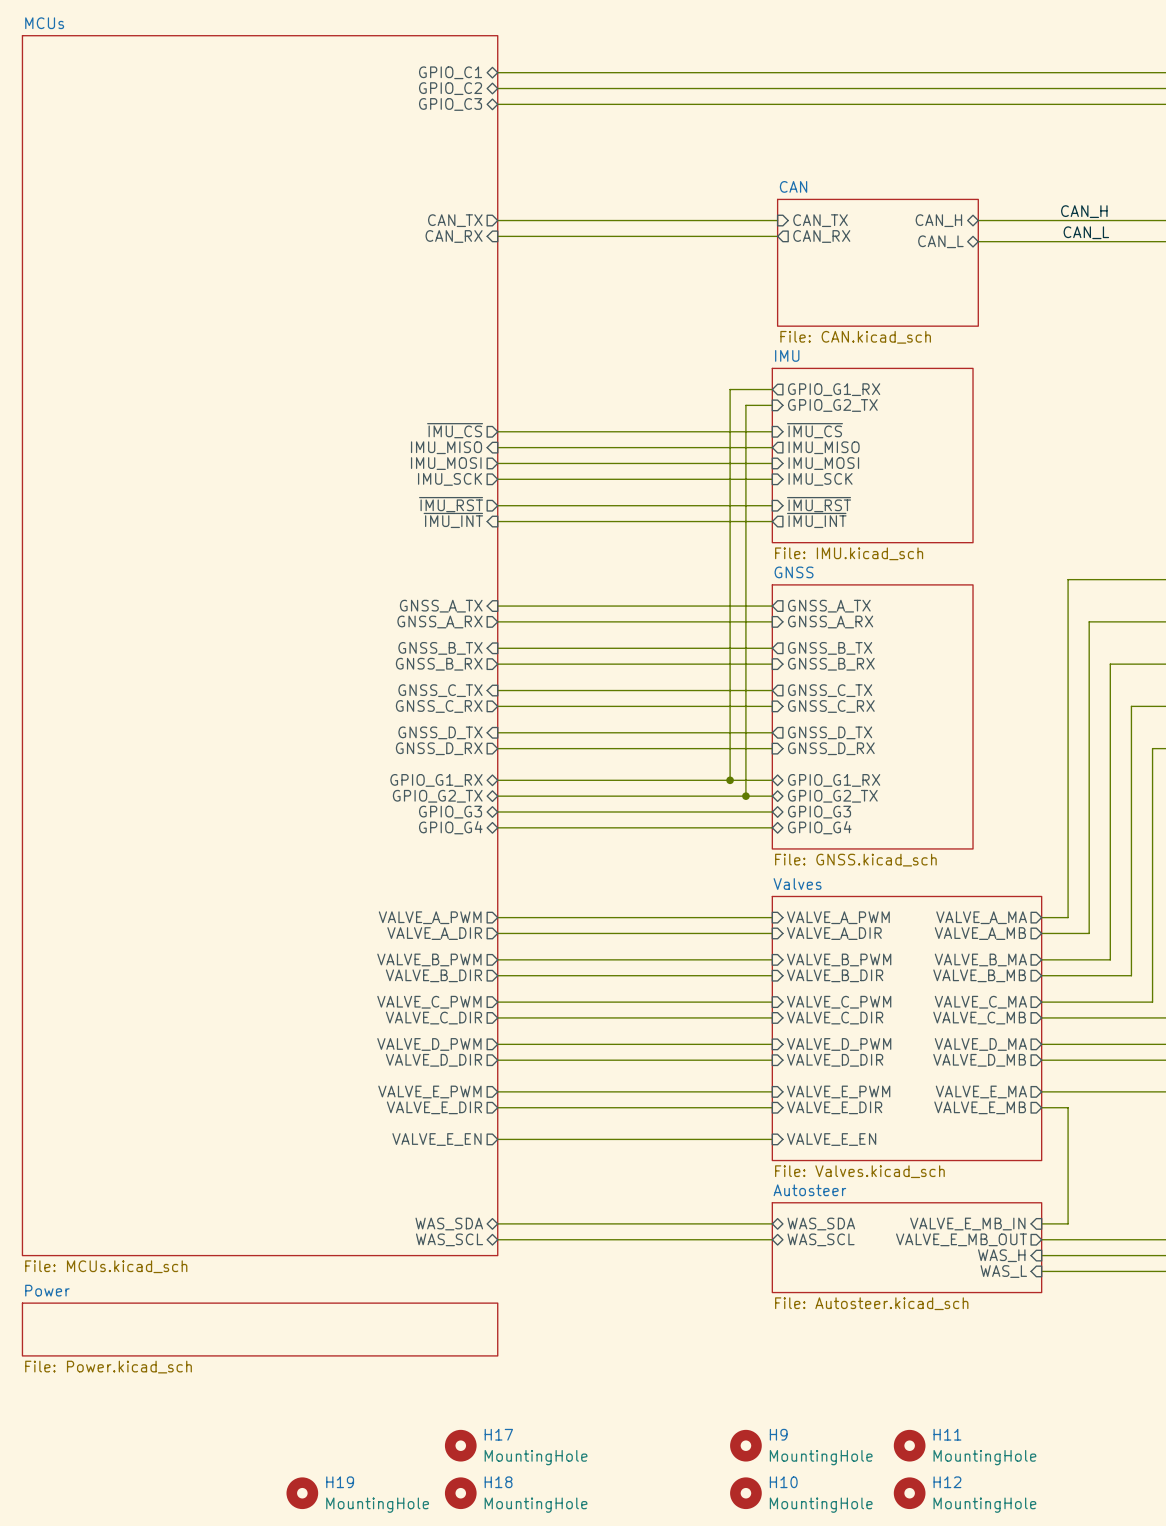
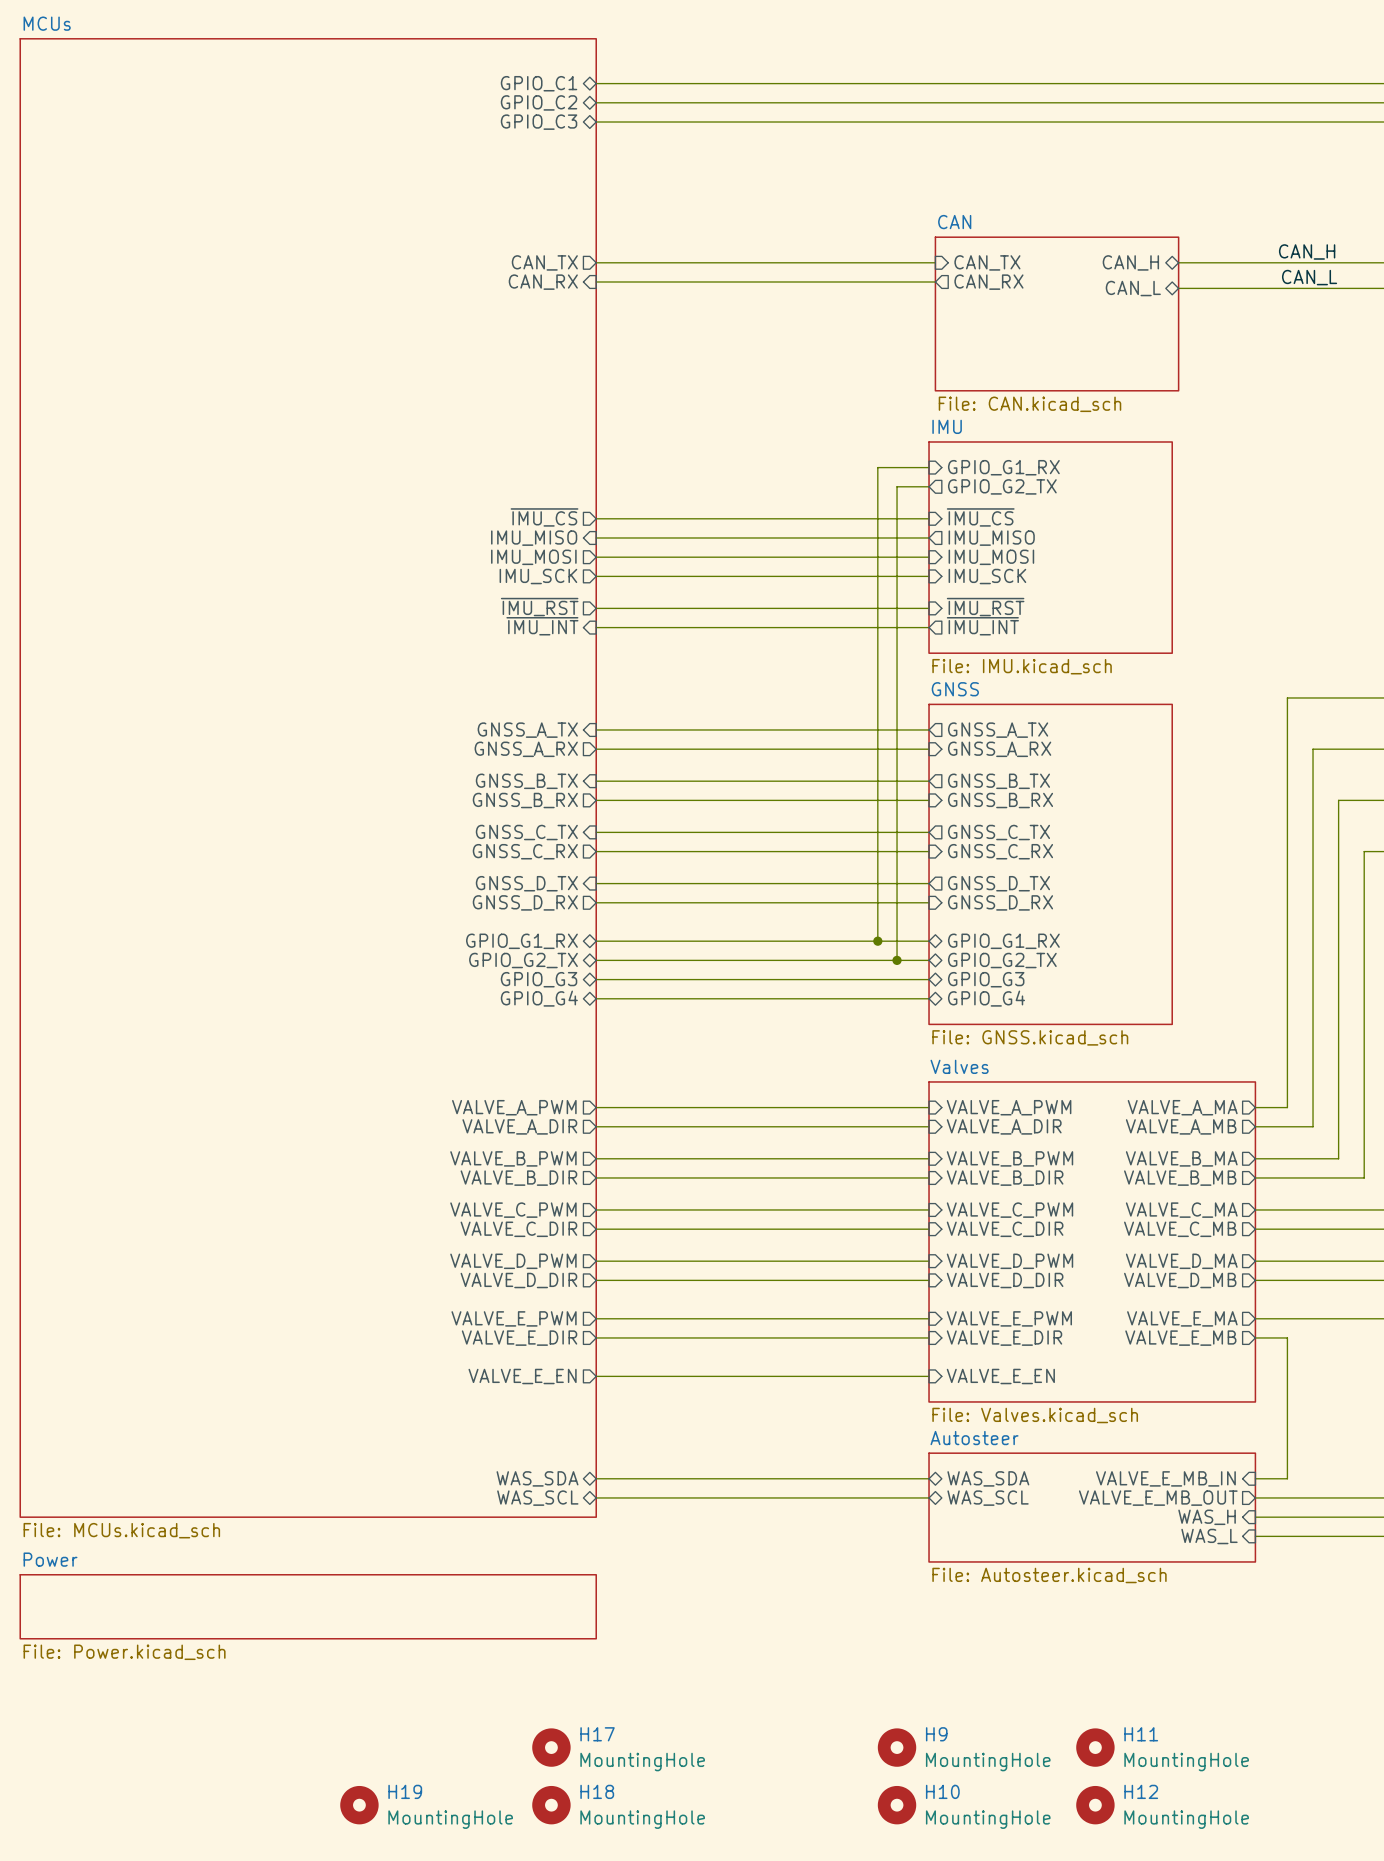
sheet pin shape: output (834, 389) -> input (1003, 467)
sheet pin shape: input (832, 405) -> output (1002, 486)

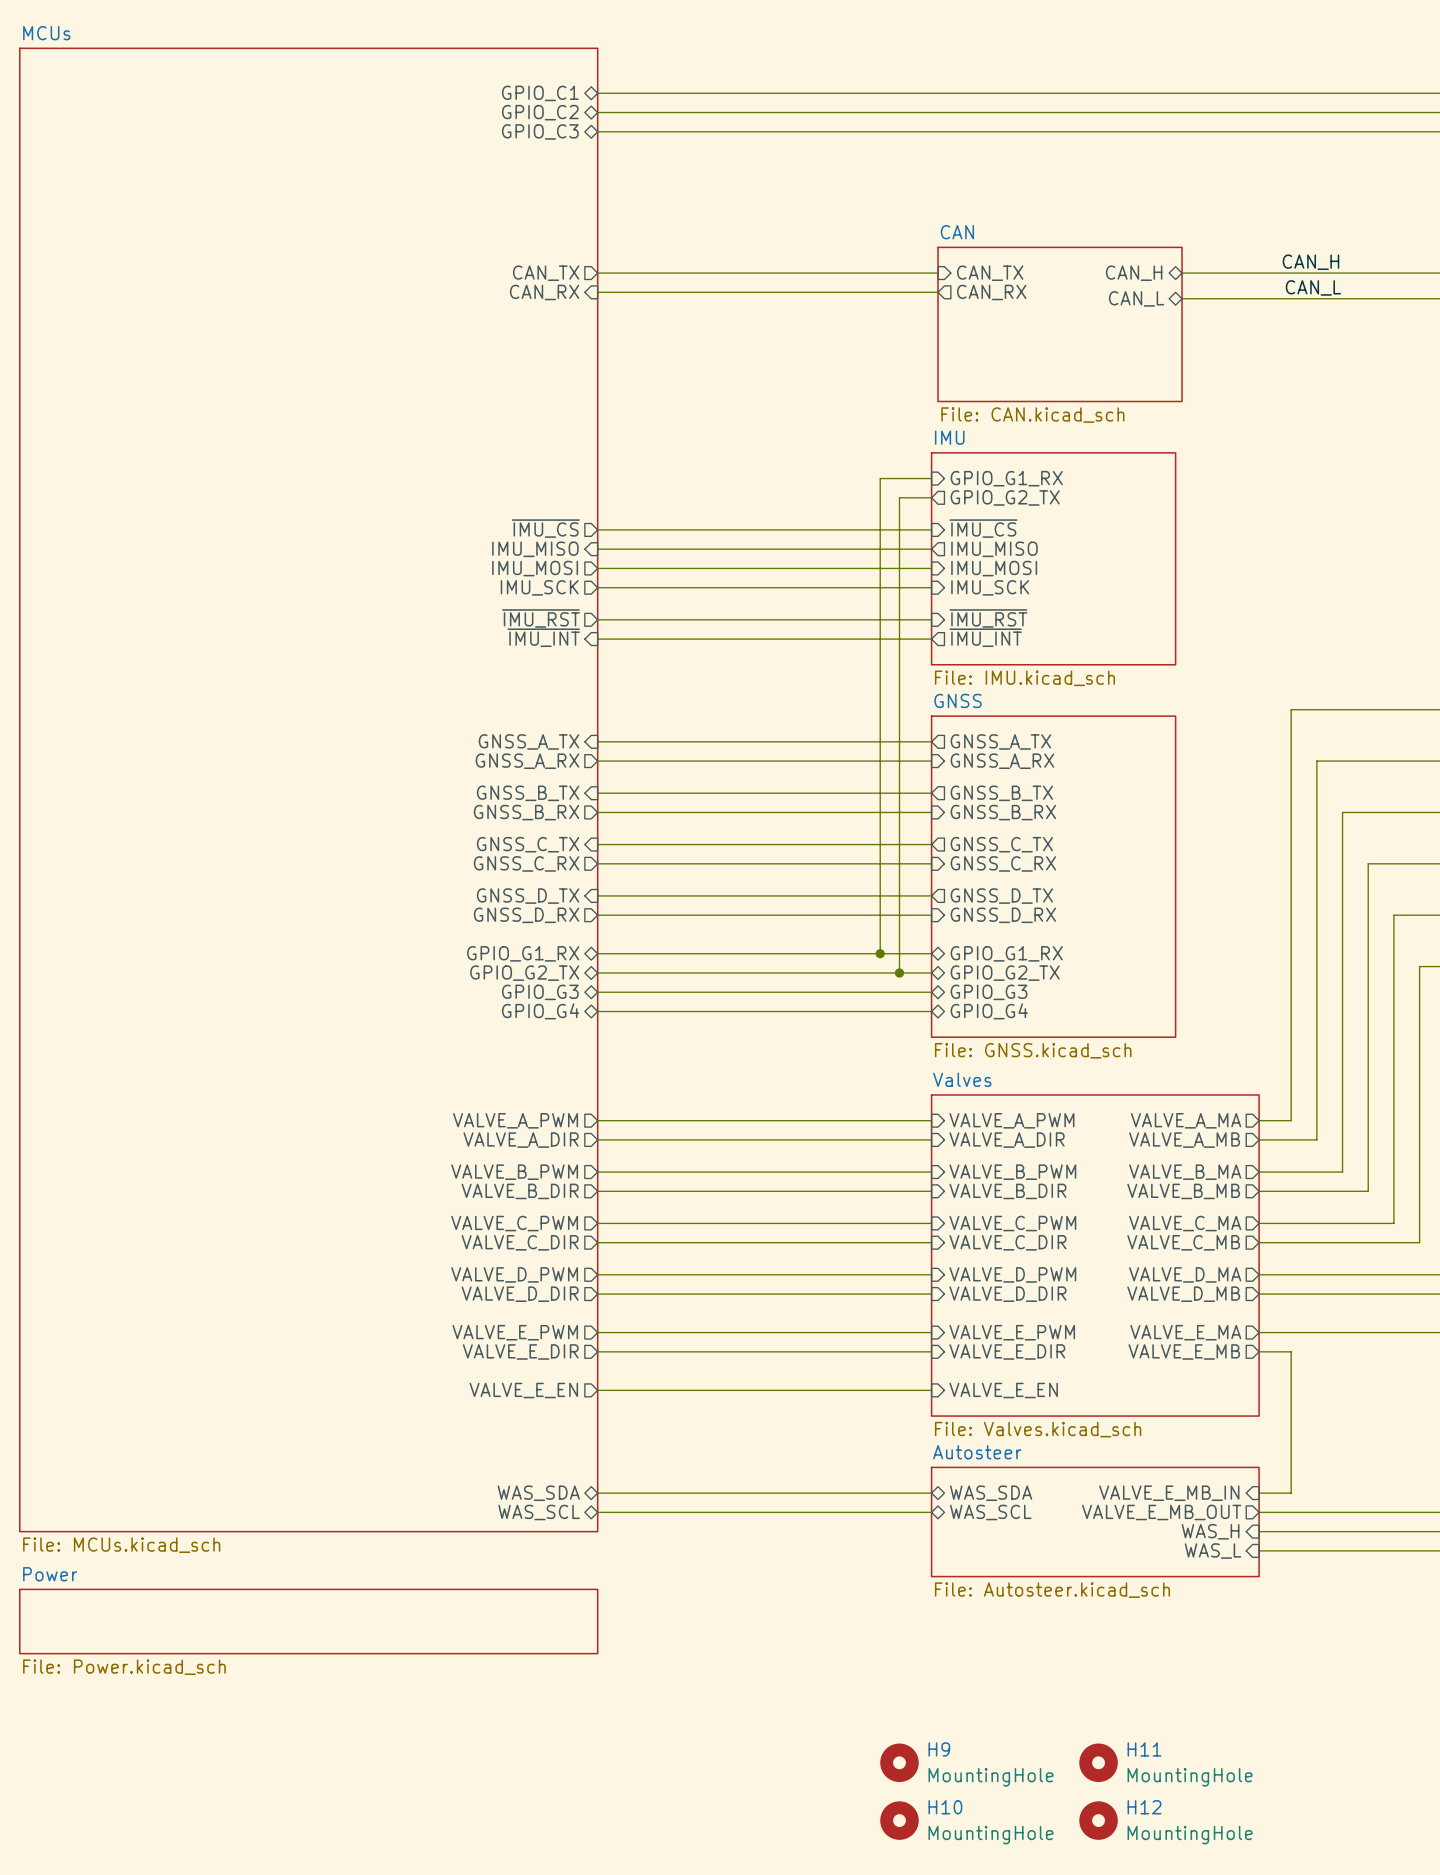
H17: MountingHole (551, 1747) -> none
H19: MountingHole (359, 1805) -> none
H18: MountingHole (551, 1805) -> none

